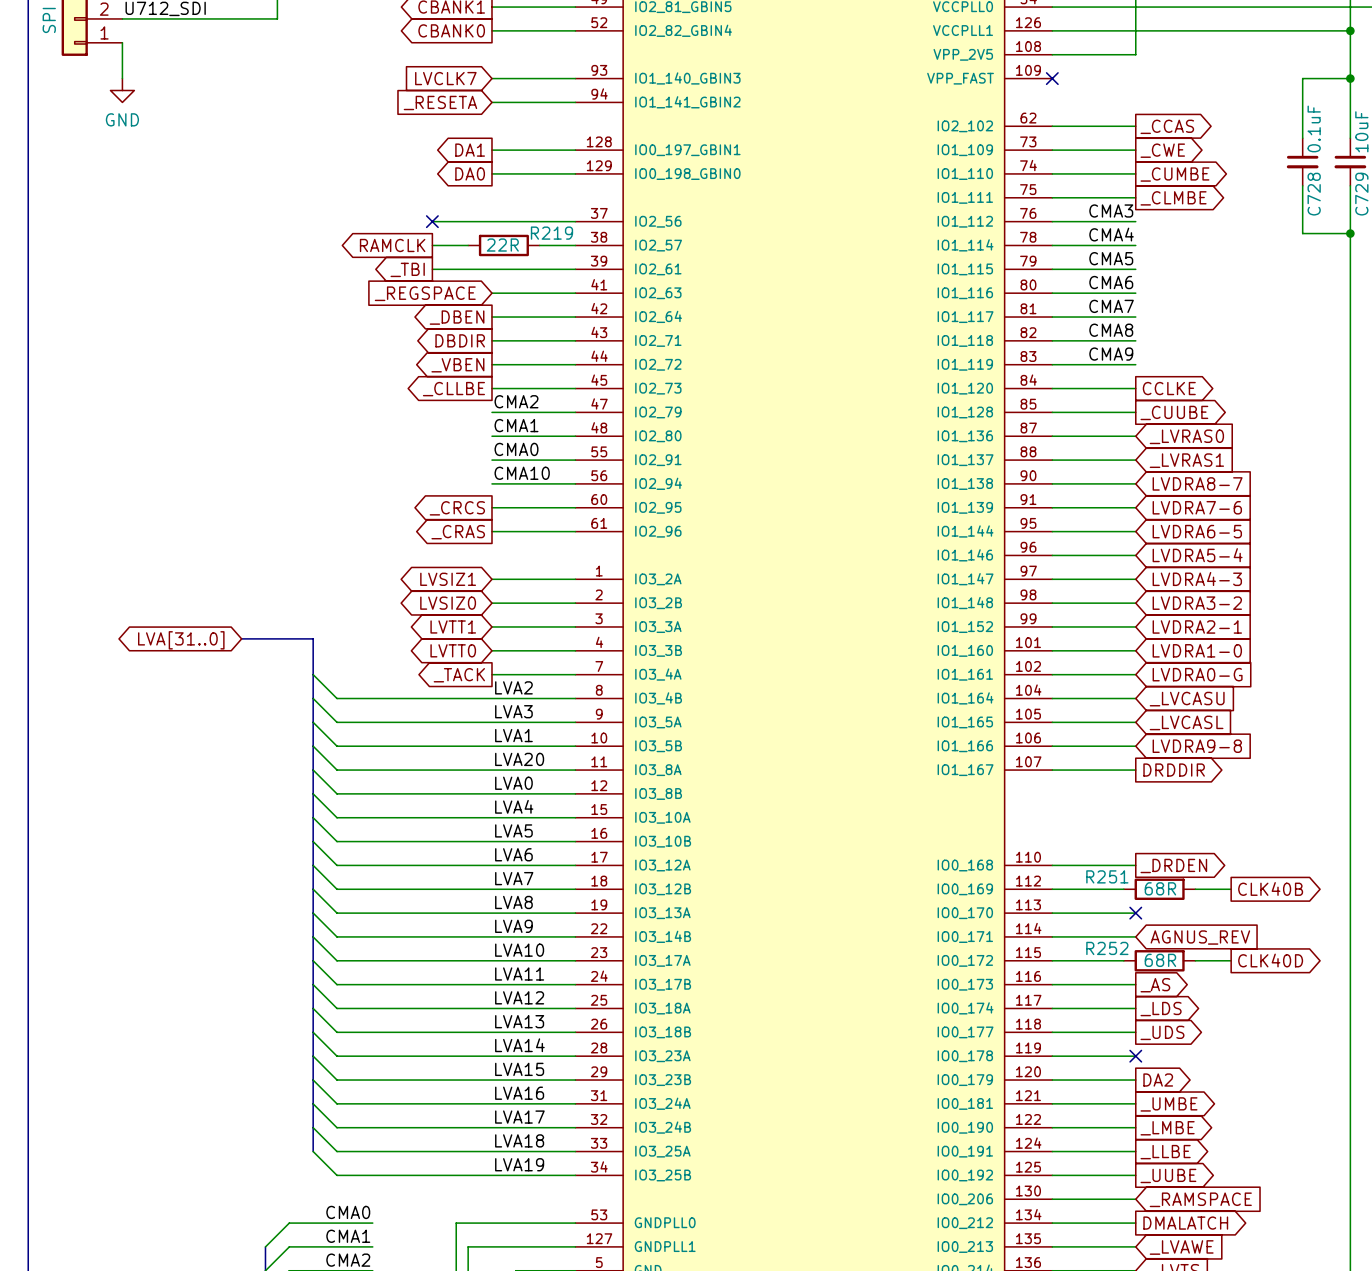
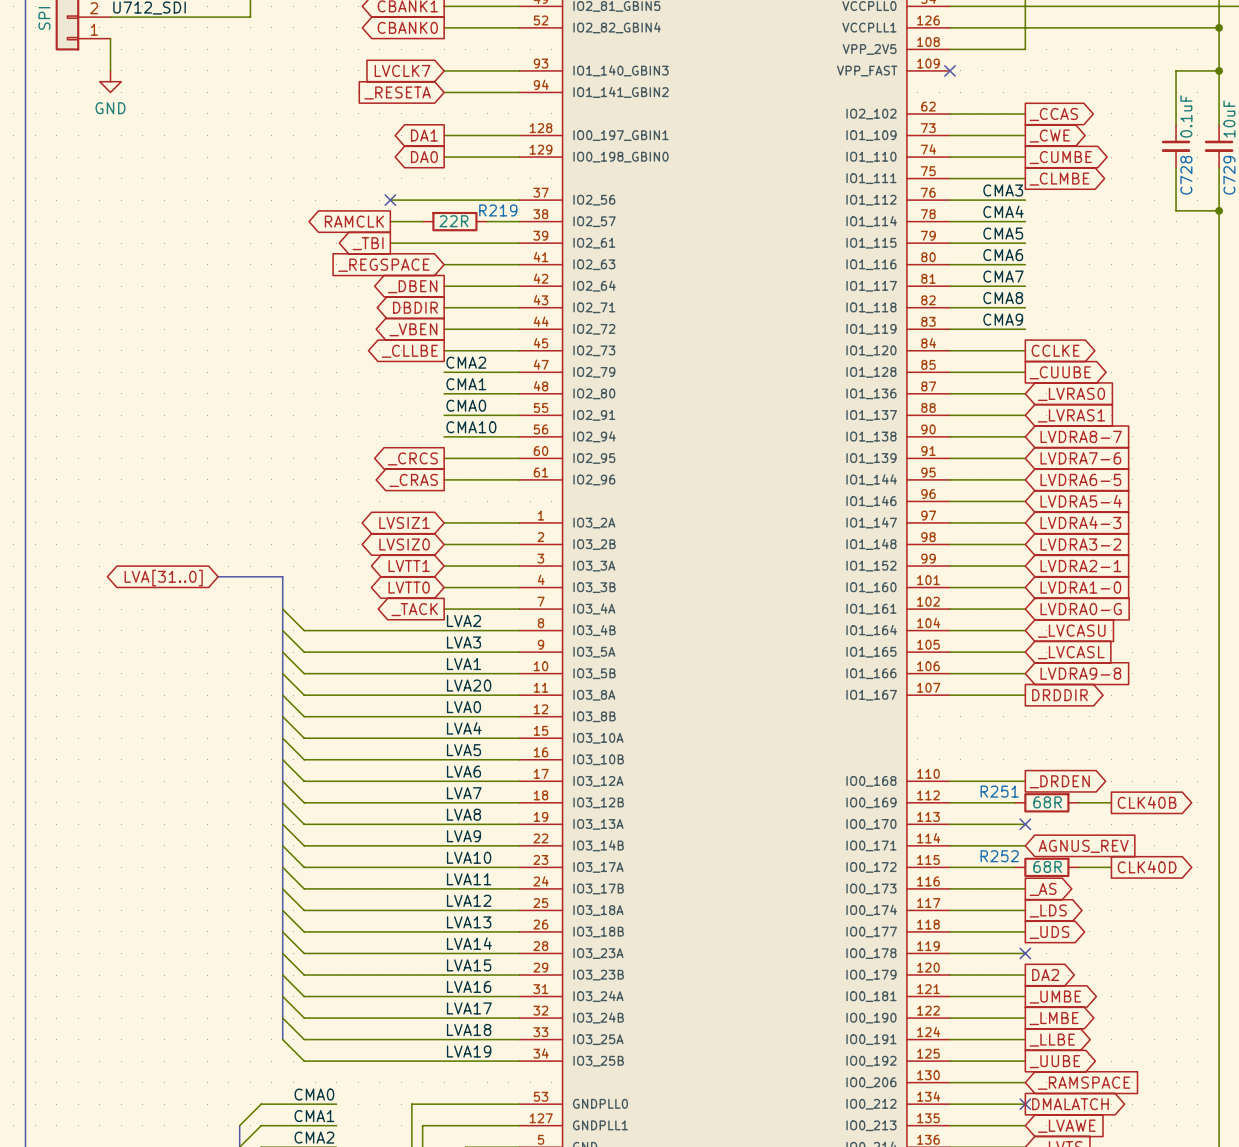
no-connect mark: none -> (1025, 1104)

